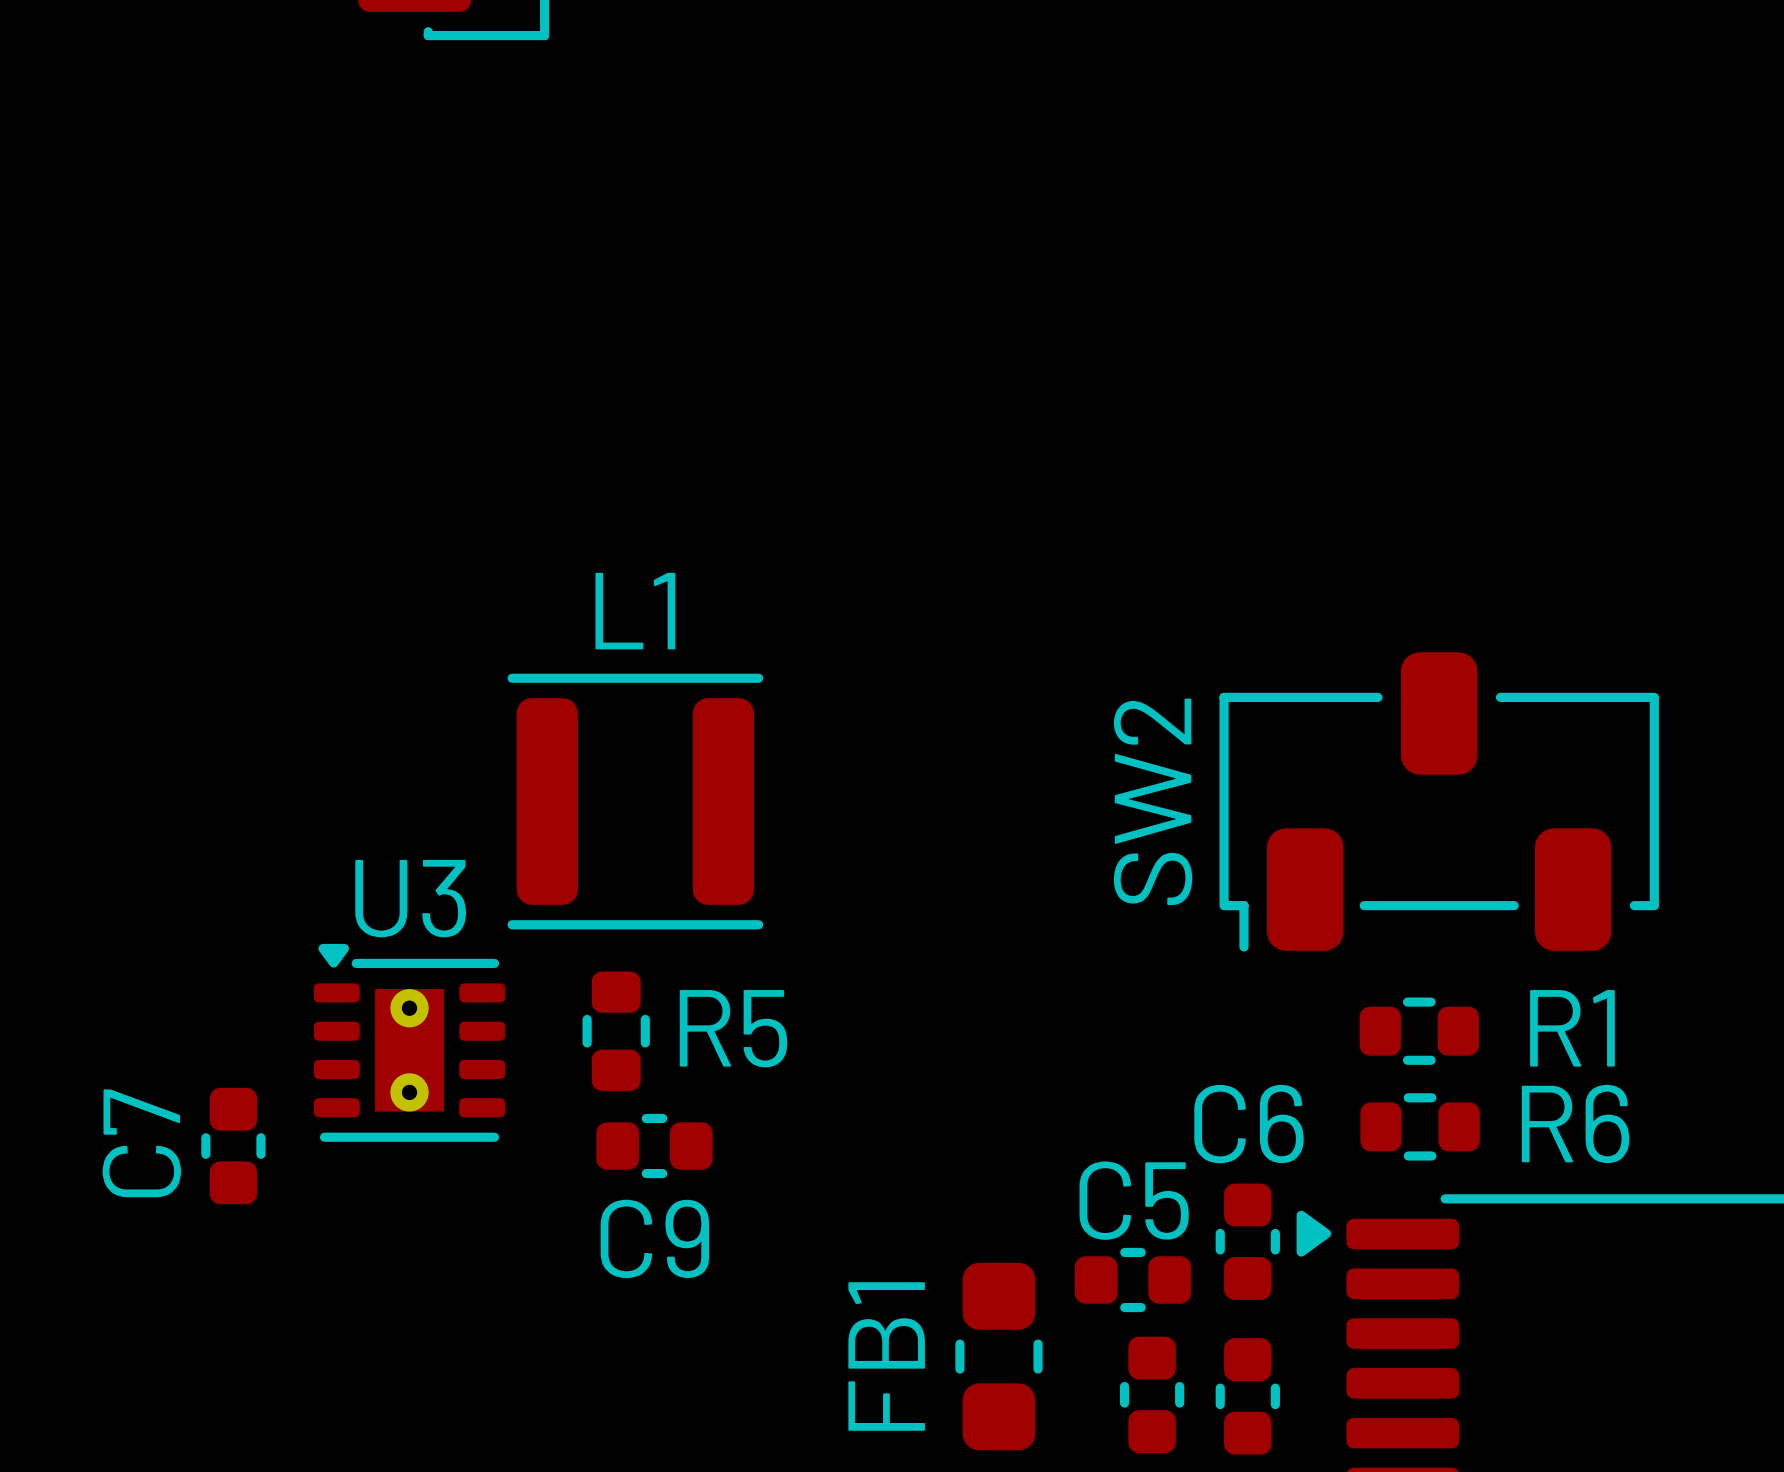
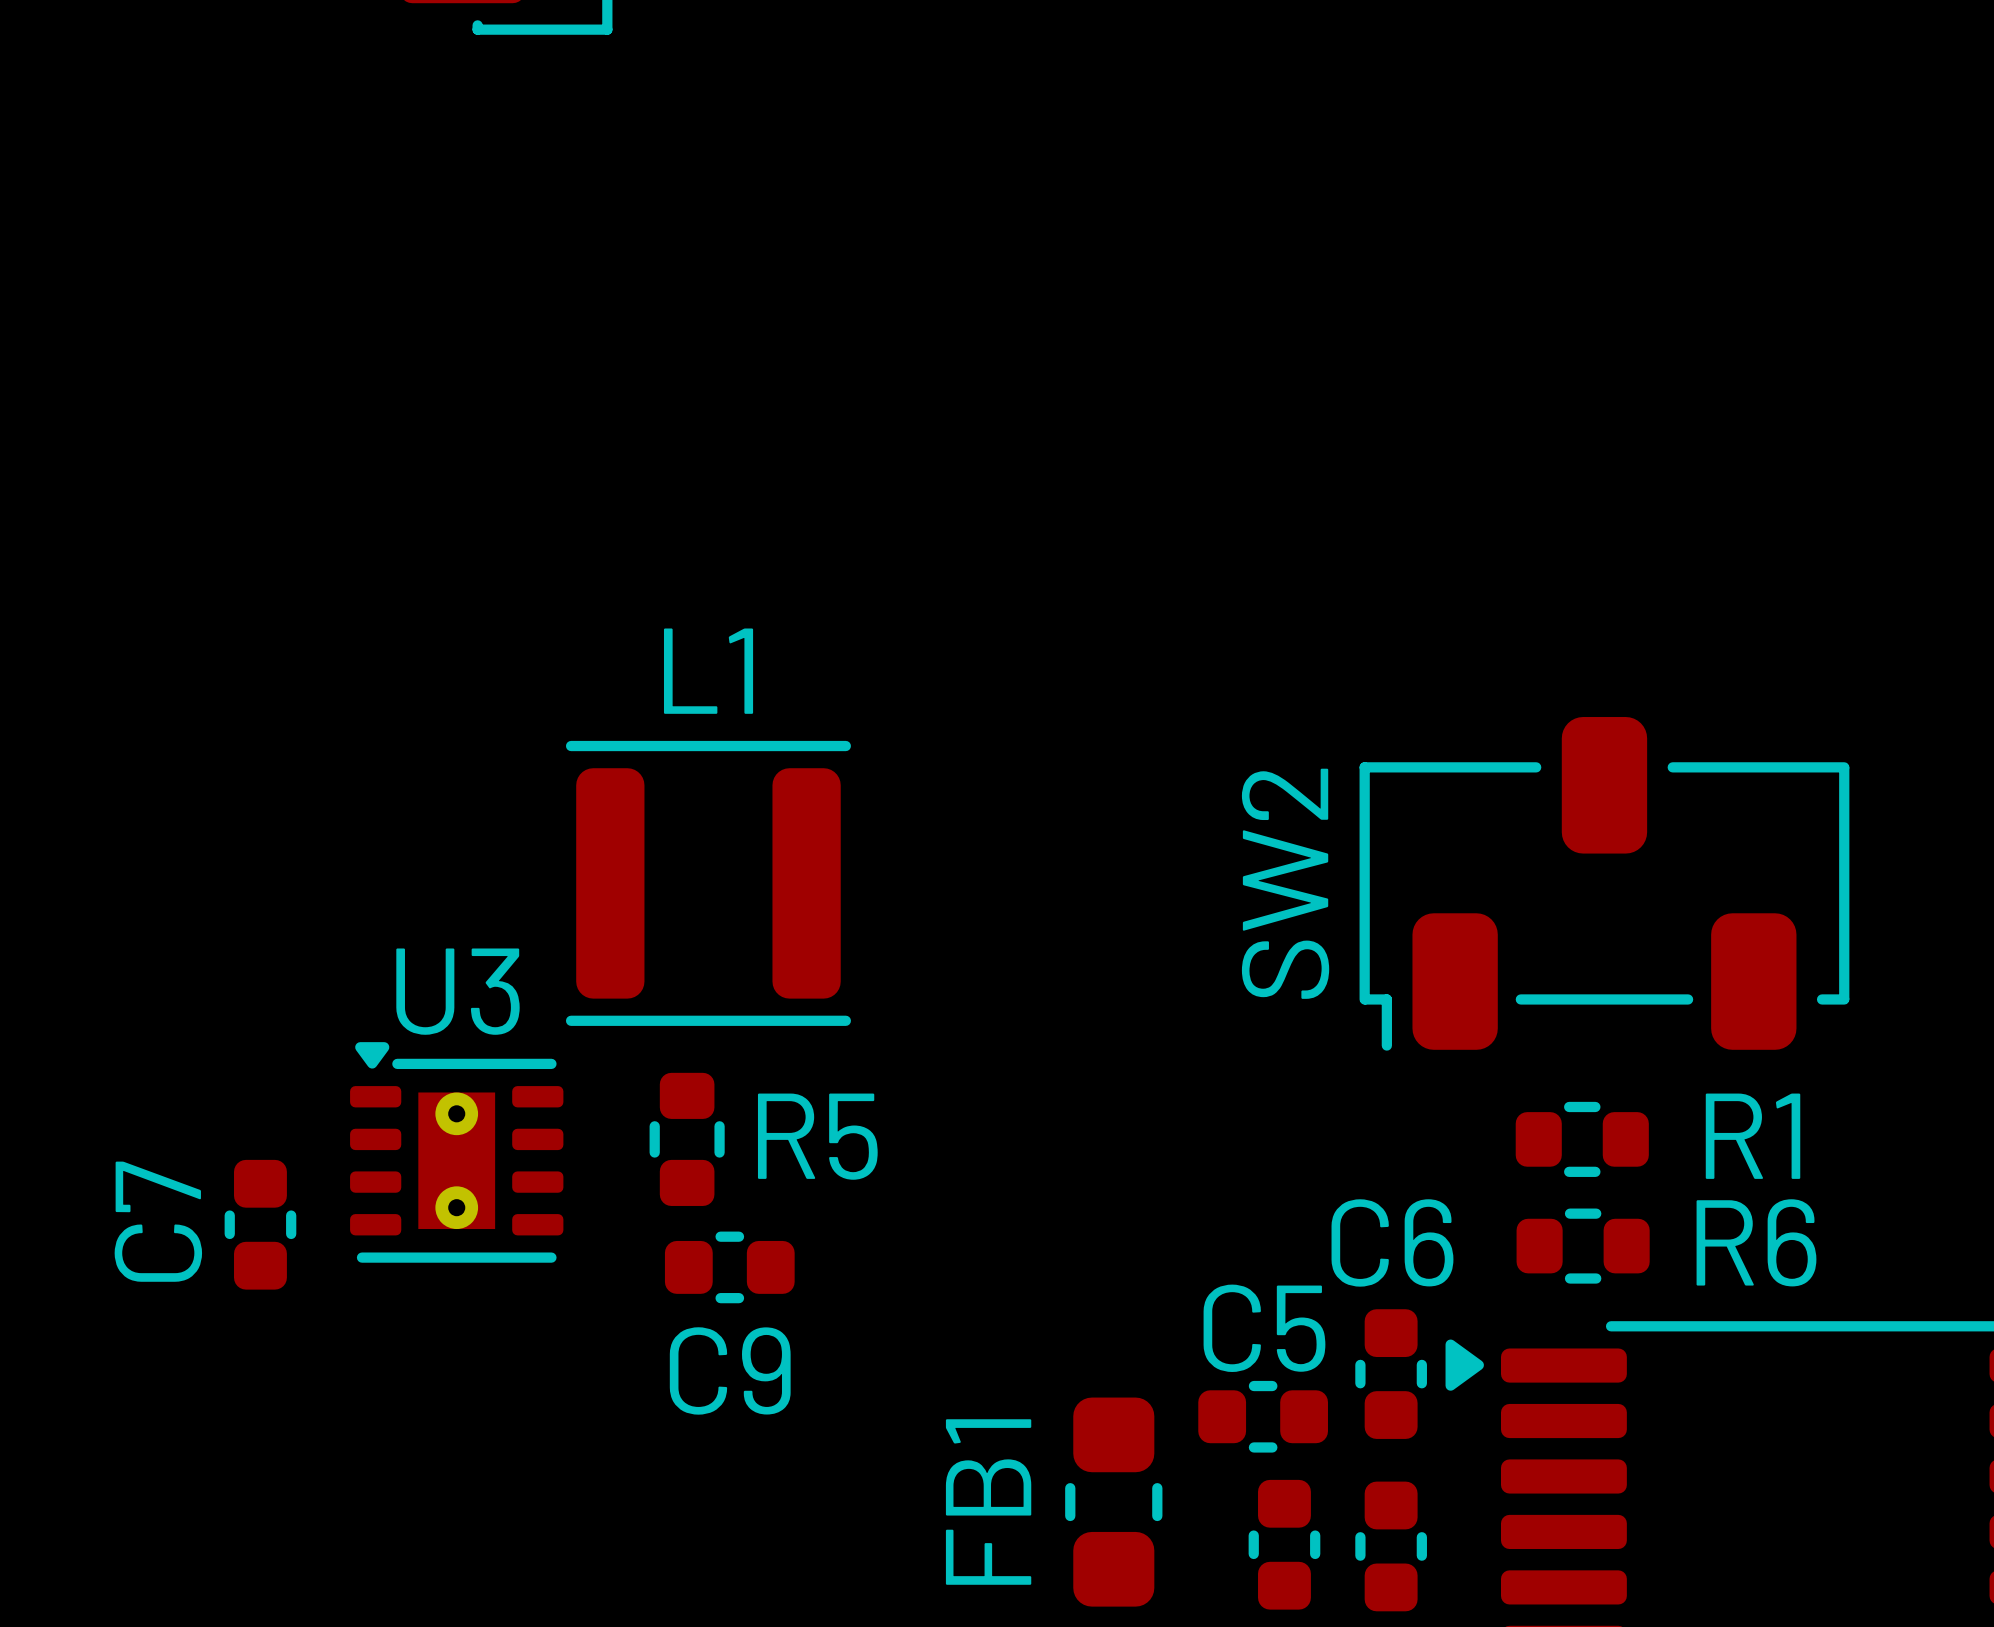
C7 position: (233, 1146) -> (260, 1224)

